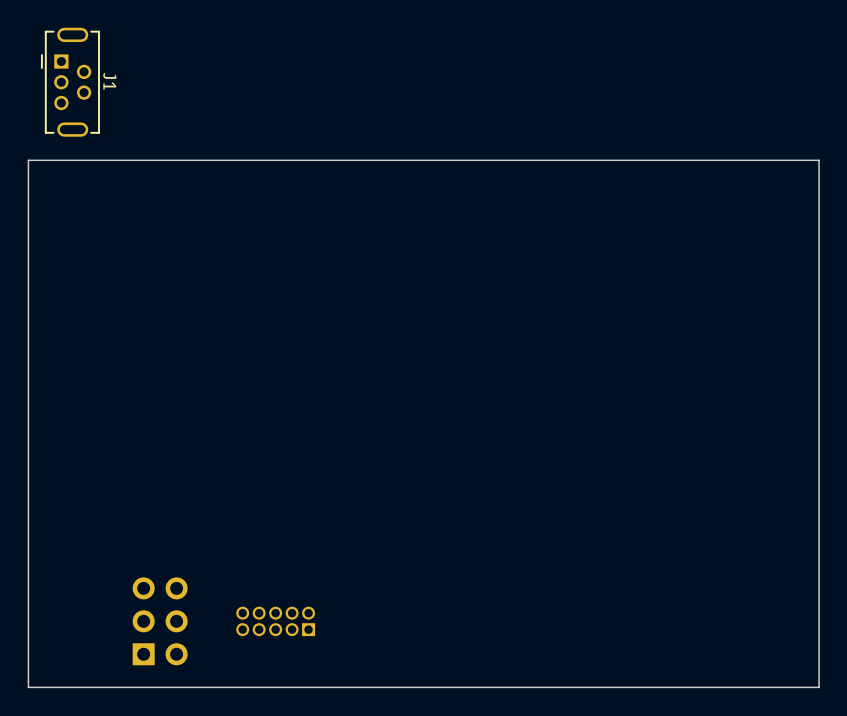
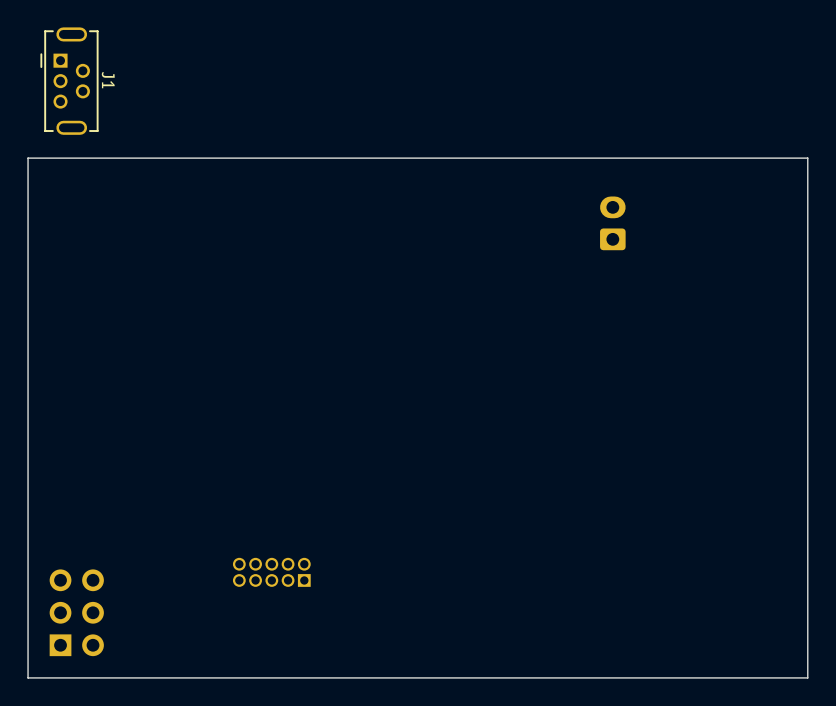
part: none -> (612, 223)
part position: (160, 621) -> (76, 612)
part position: (275, 621) -> (271, 572)

